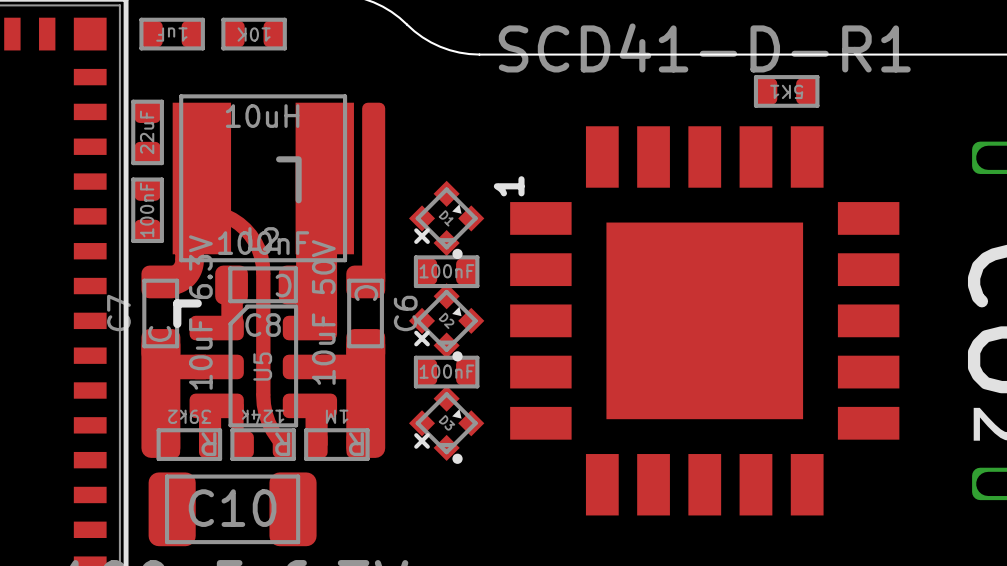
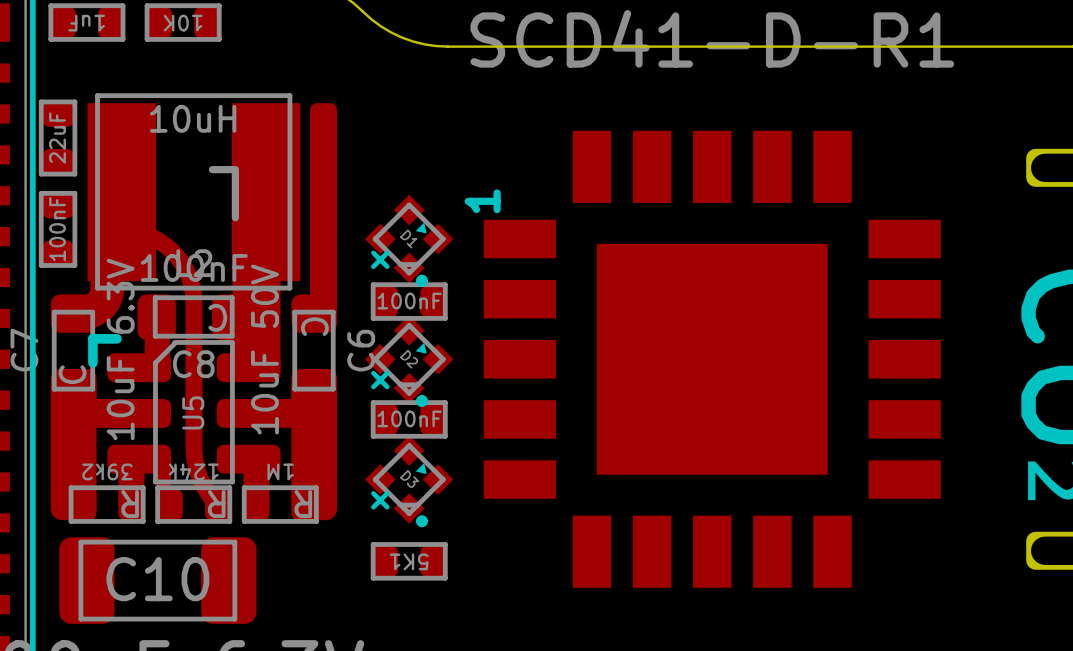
part position: (786, 91) -> (409, 561)

